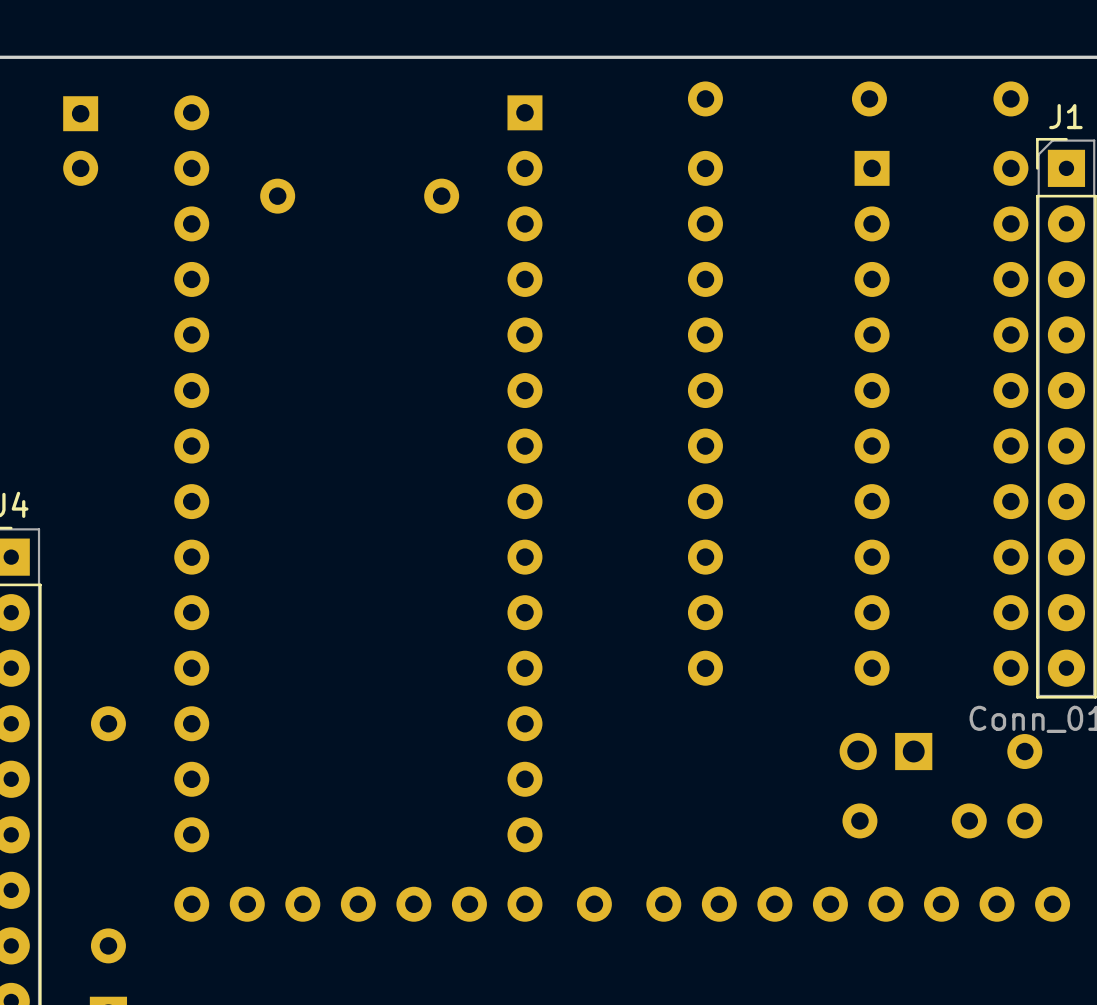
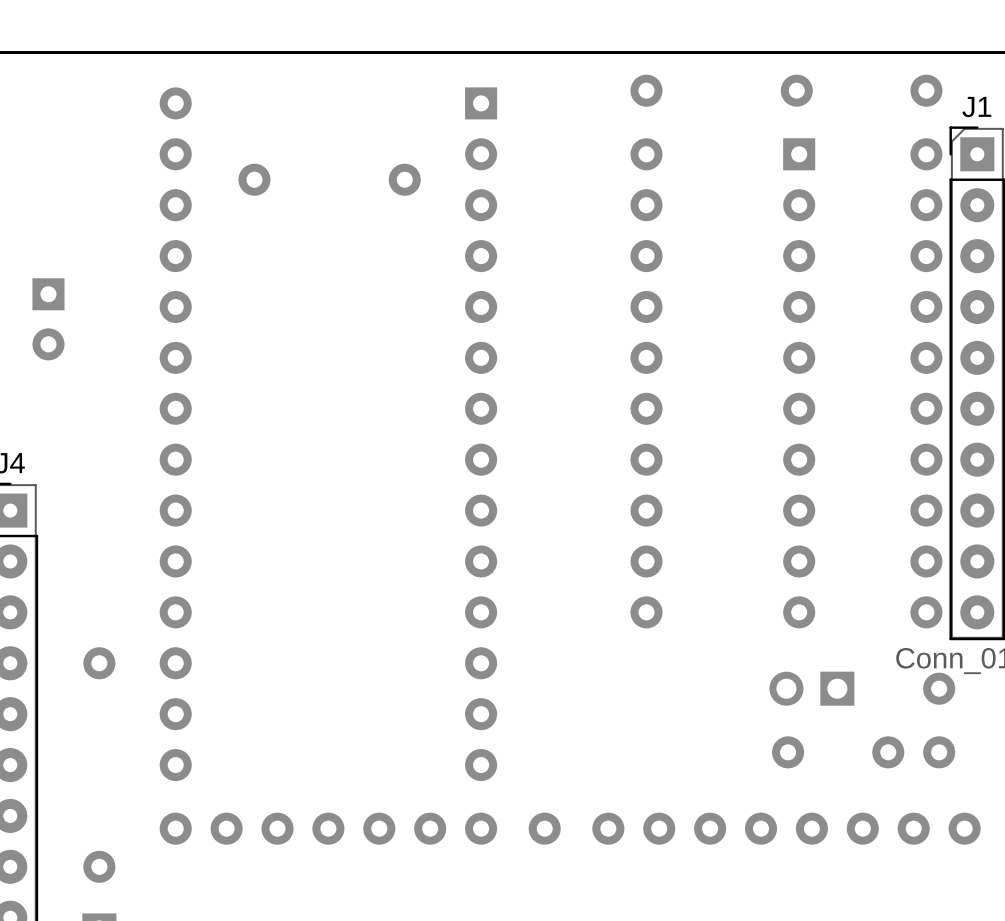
part position: (80, 141) -> (48, 319)

